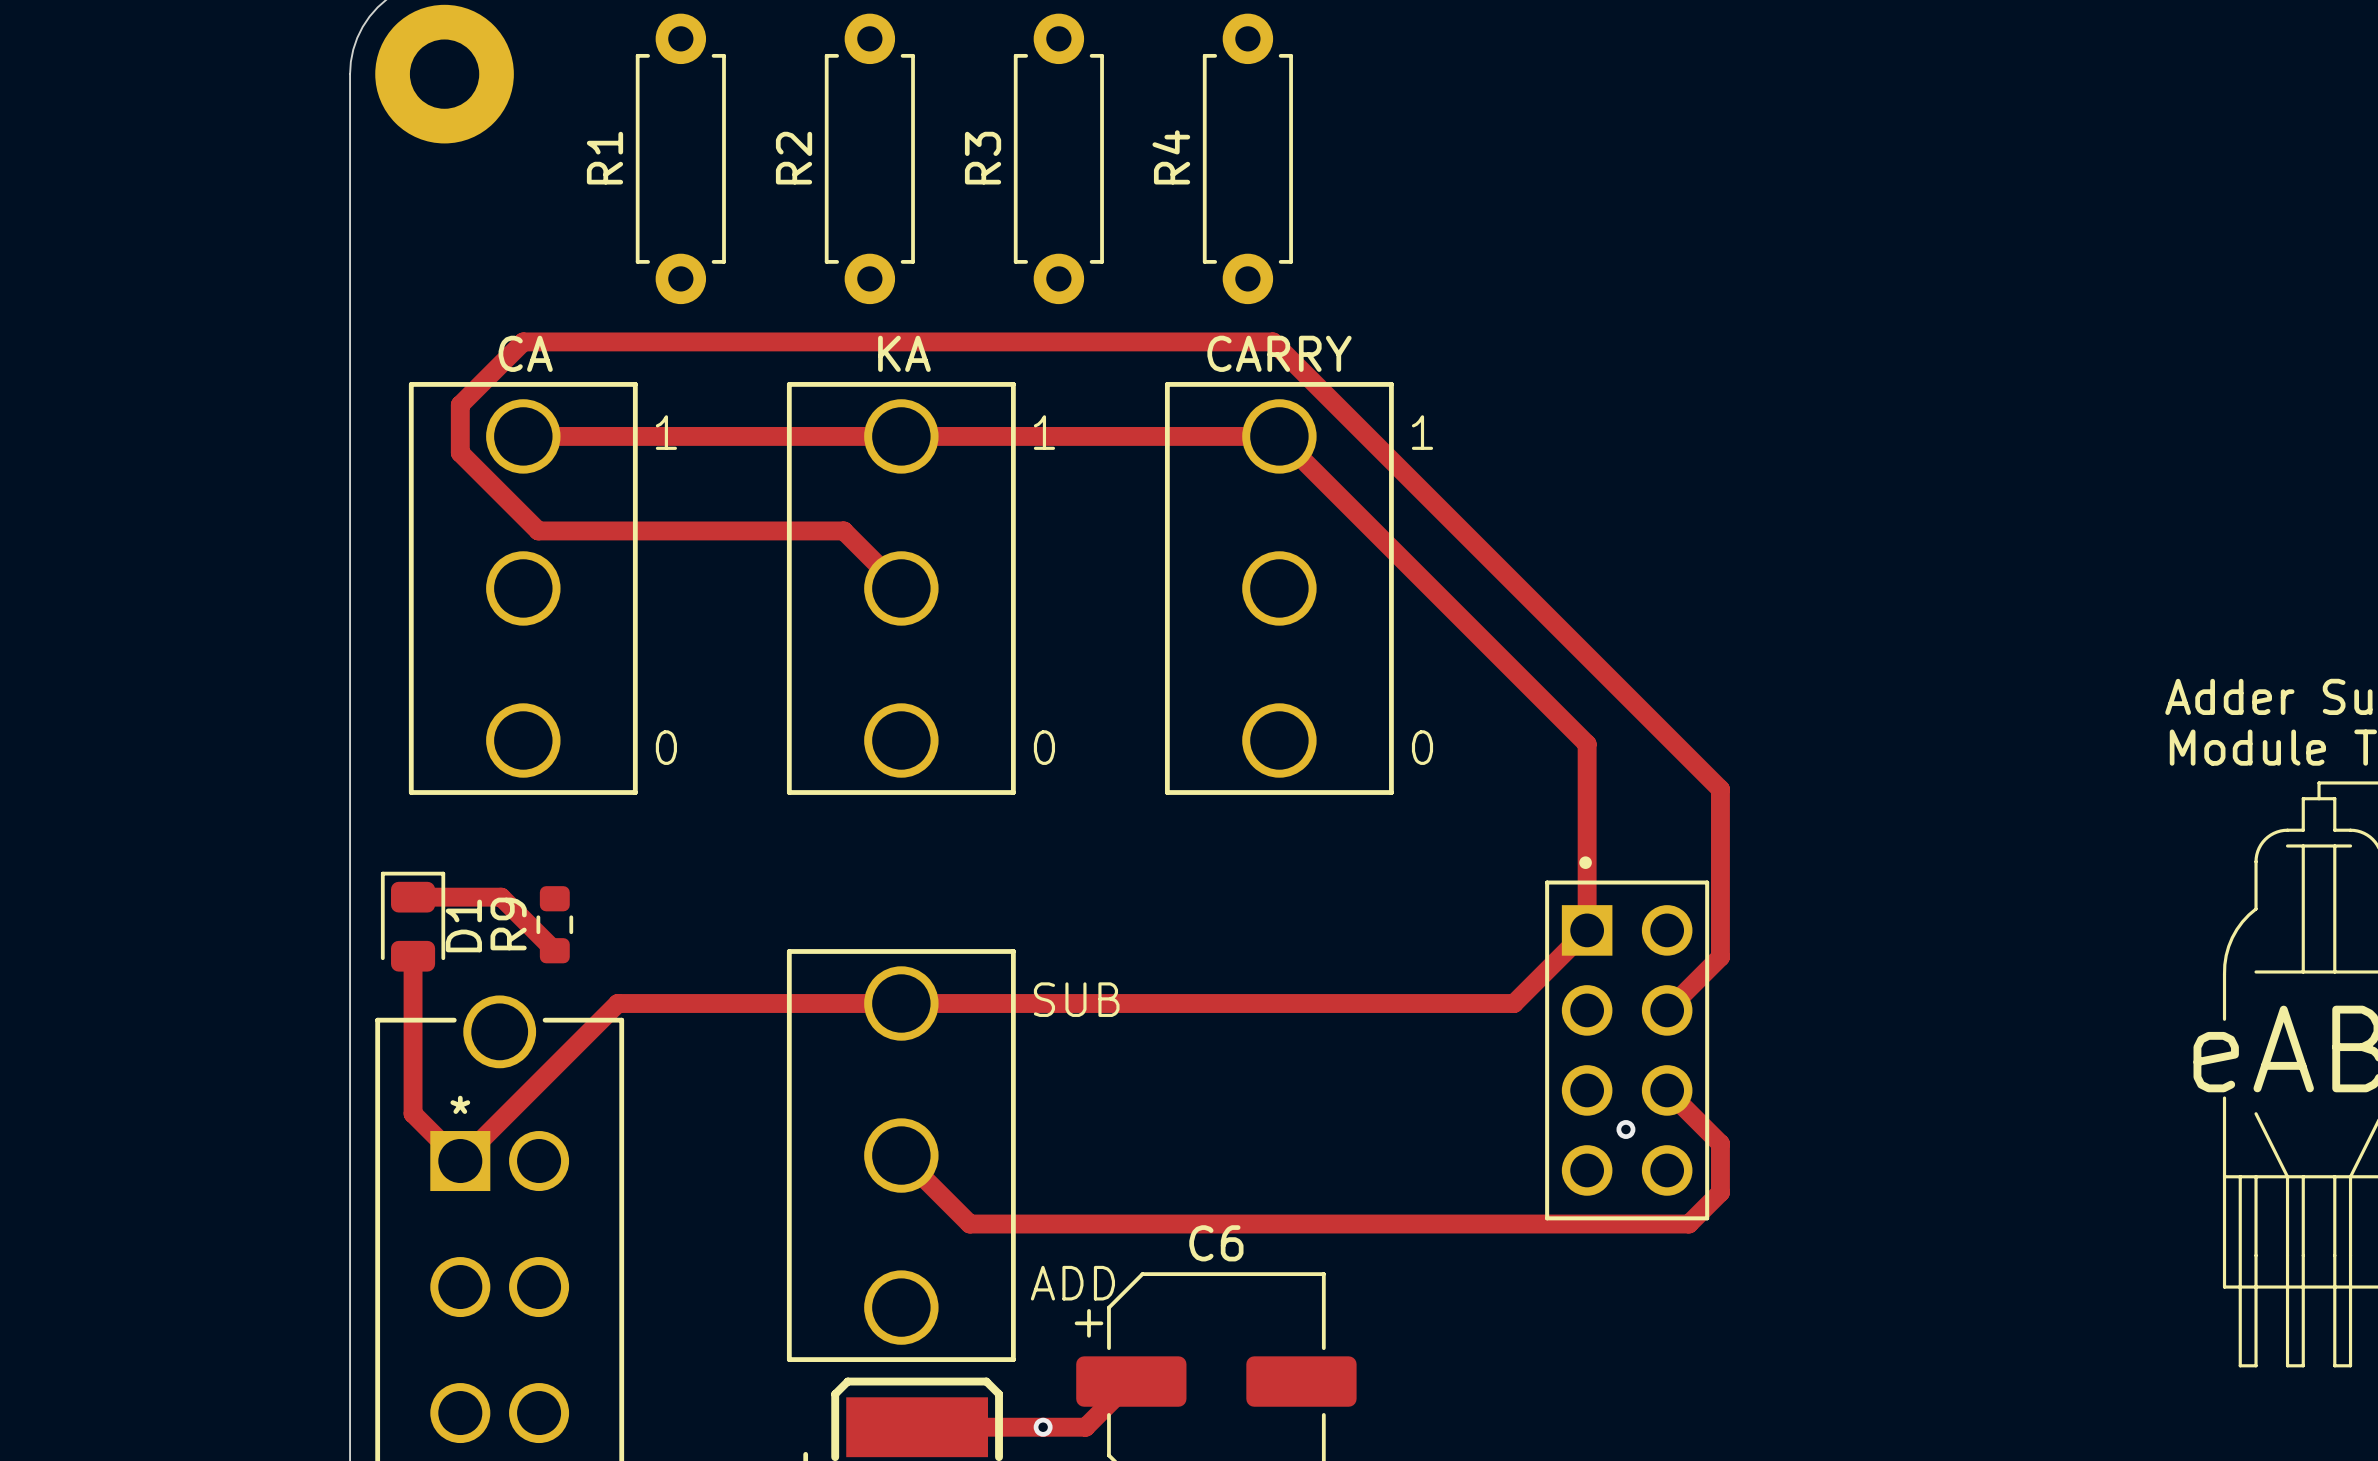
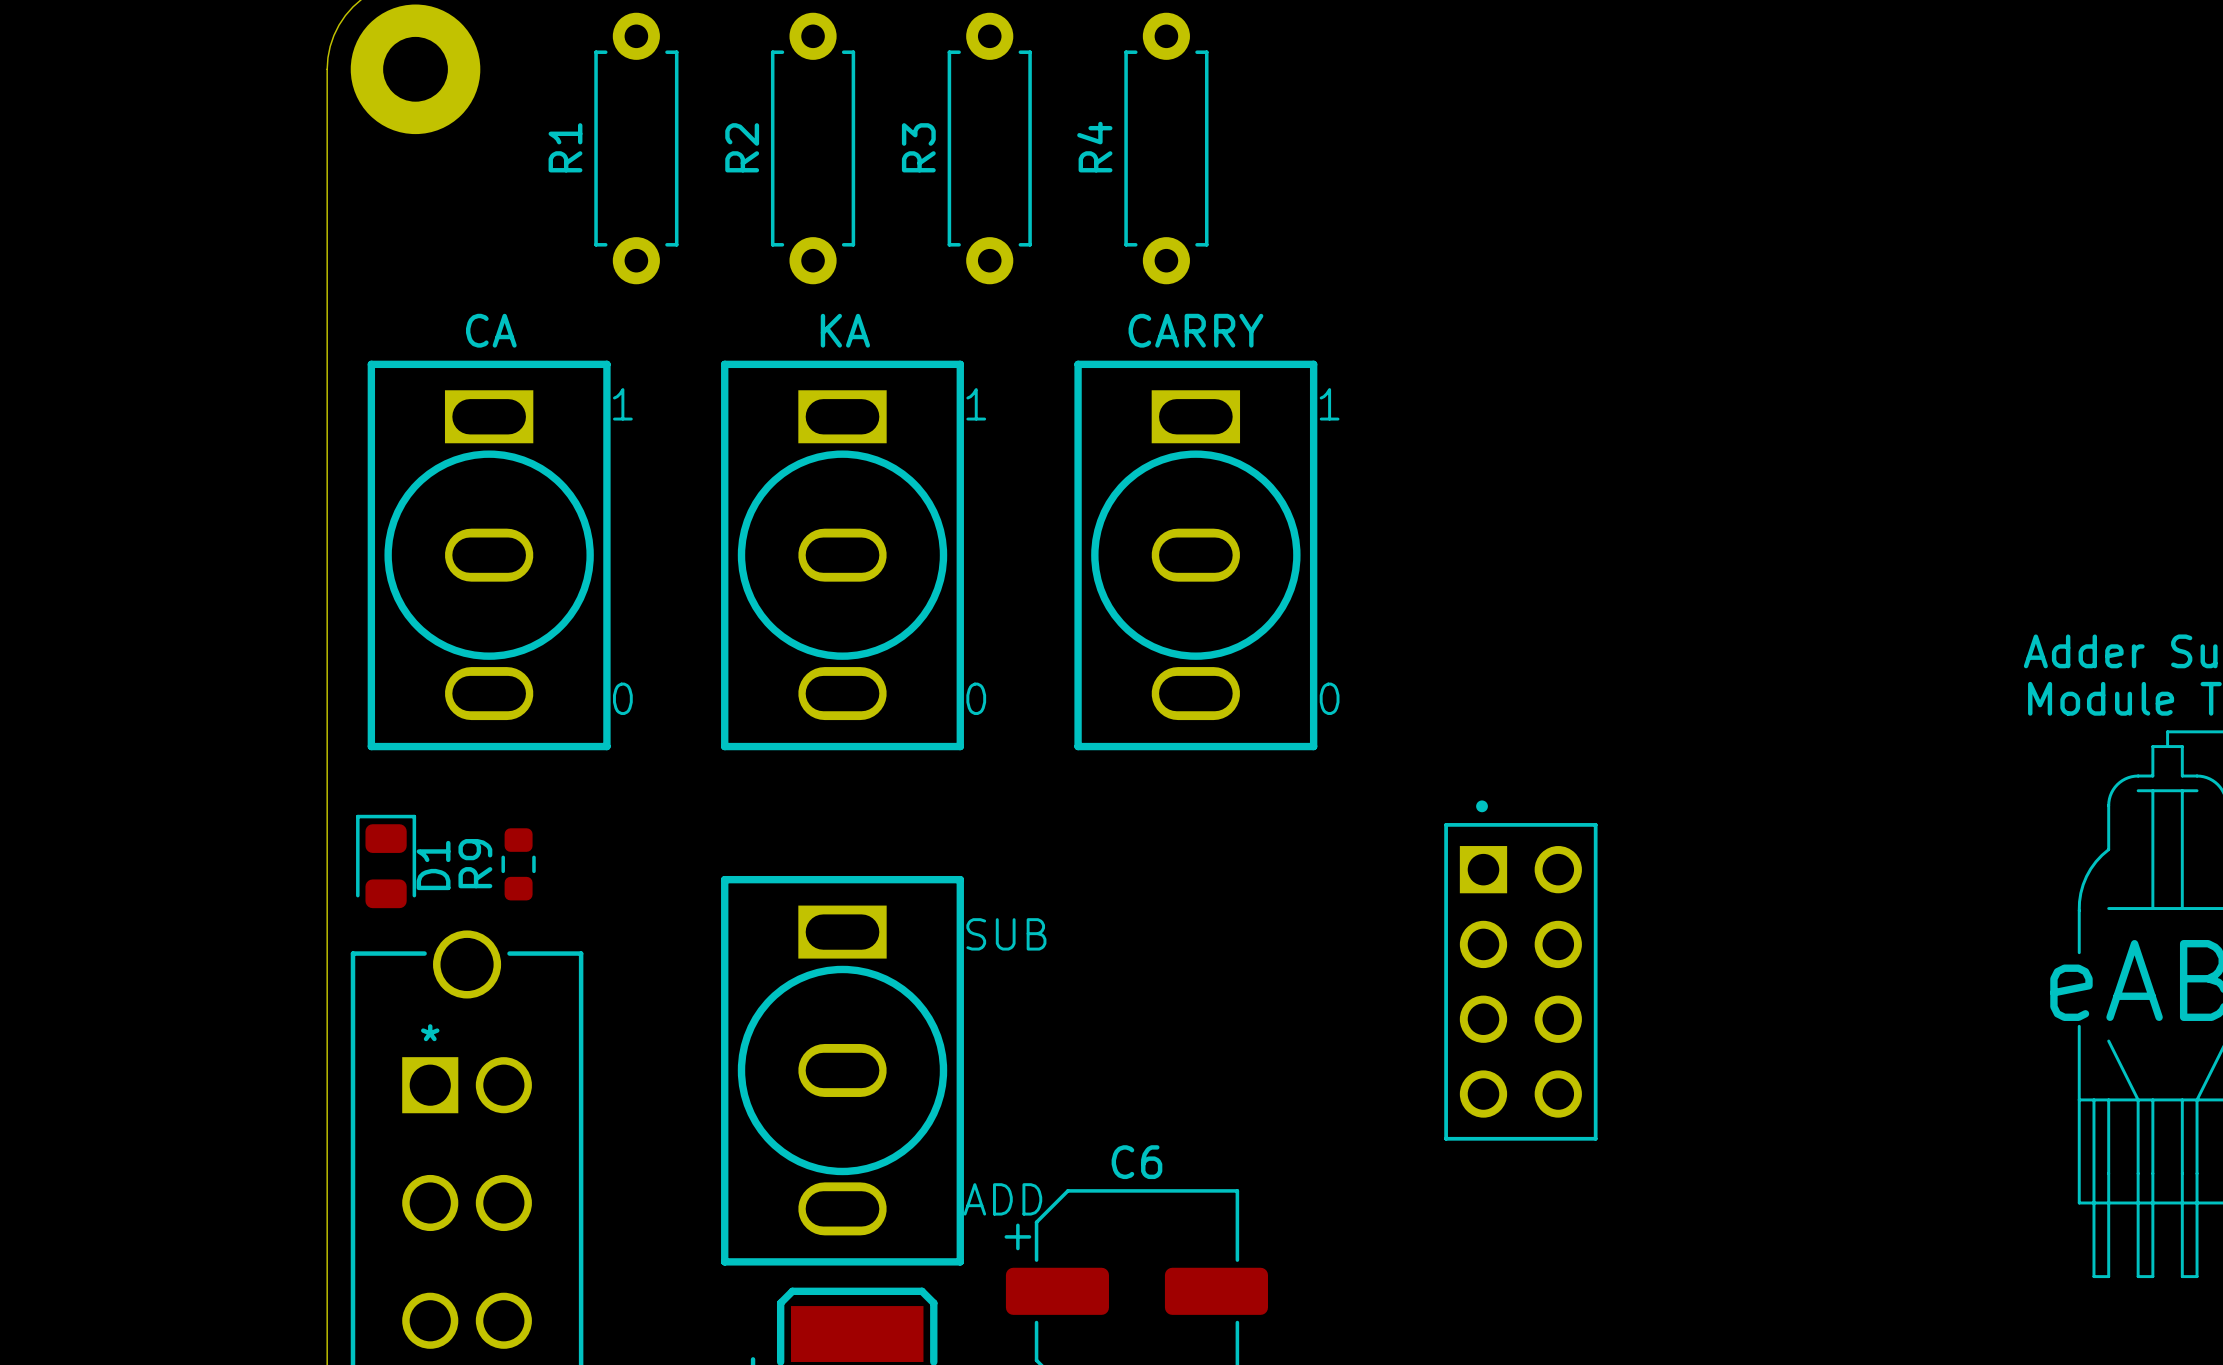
part footprint: [408, 382, 638, 795] -> [367, 360, 611, 751]
part footprint: [786, 382, 1016, 795] -> [721, 360, 964, 751]
part footprint: [1164, 382, 1394, 795] -> [1074, 360, 1318, 751]
track: (523, 436) (1279, 436) (1587, 744) (1587, 930) (1514, 1003) (617, 1003) (460, 1161) (413, 1113) (413, 956) -> none
track: (901, 588) (843, 530) (538, 530) (460, 452) (460, 404) (523, 341) (1273, 341) (1720, 789) (1720, 957) (1667, 1010) -> none
track: (413, 897) (501, 897) (554, 950) -> none
part footprint: [786, 949, 1016, 1362] -> [721, 875, 964, 1266]
track: (1667, 1090) (1720, 1143) (1720, 1192) (1688, 1224) (969, 1224) (901, 1155) (921, 1135) -> none
via: (1625, 1129) -> none
track: (1131, 1381) (1085, 1427) (917, 1427) -> none
via: (1043, 1427) -> none

